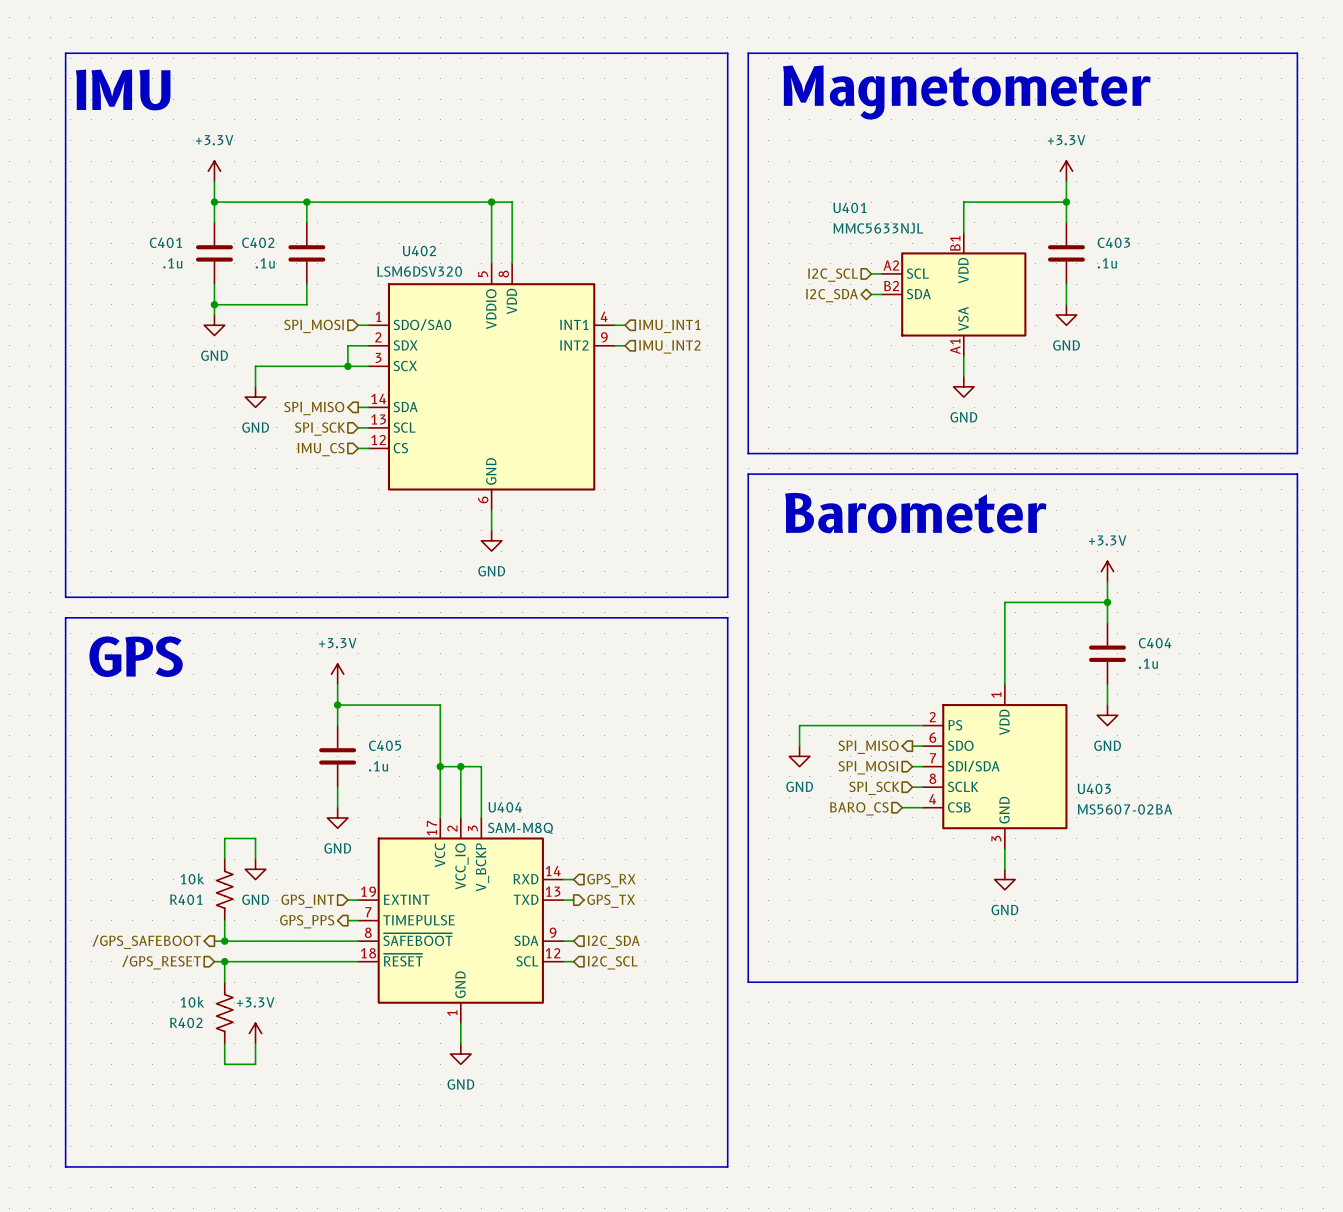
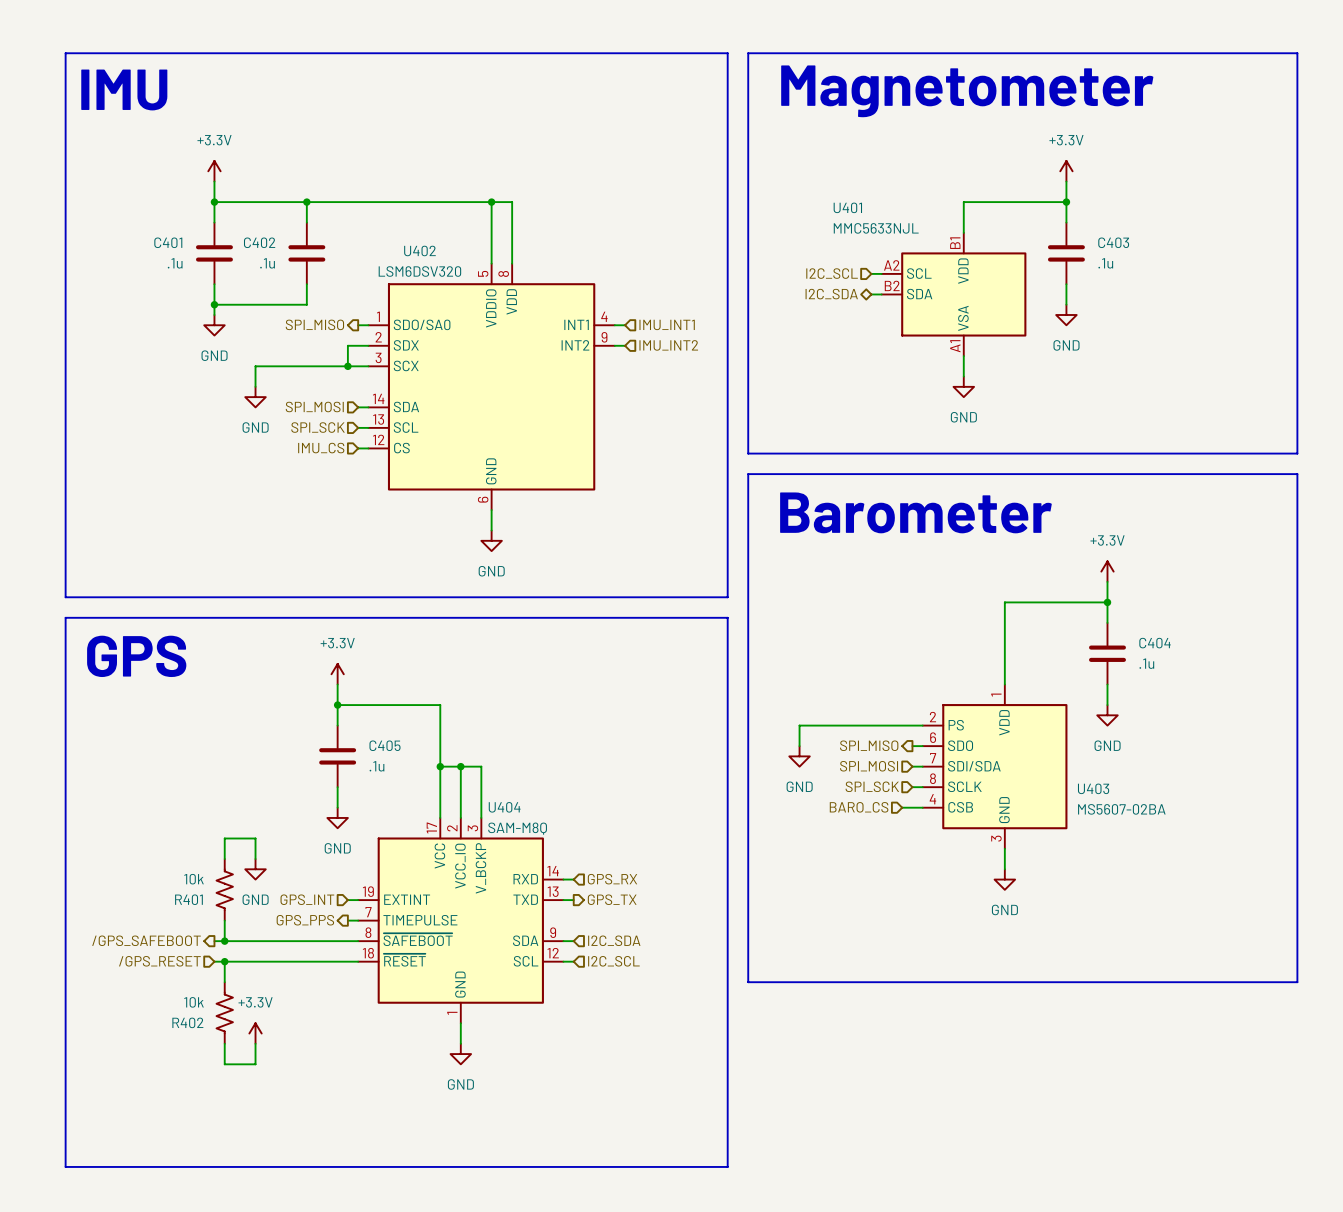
hierarchical label shape: input (314, 326) -> output (314, 324)
hierarchical label: SPI_MOSI (314, 326) -> SPI_MISO (314, 324)
hierarchical label shape: output (314, 408) -> input (314, 407)
hierarchical label: SPI_MISO (314, 408) -> SPI_MOSI (314, 407)

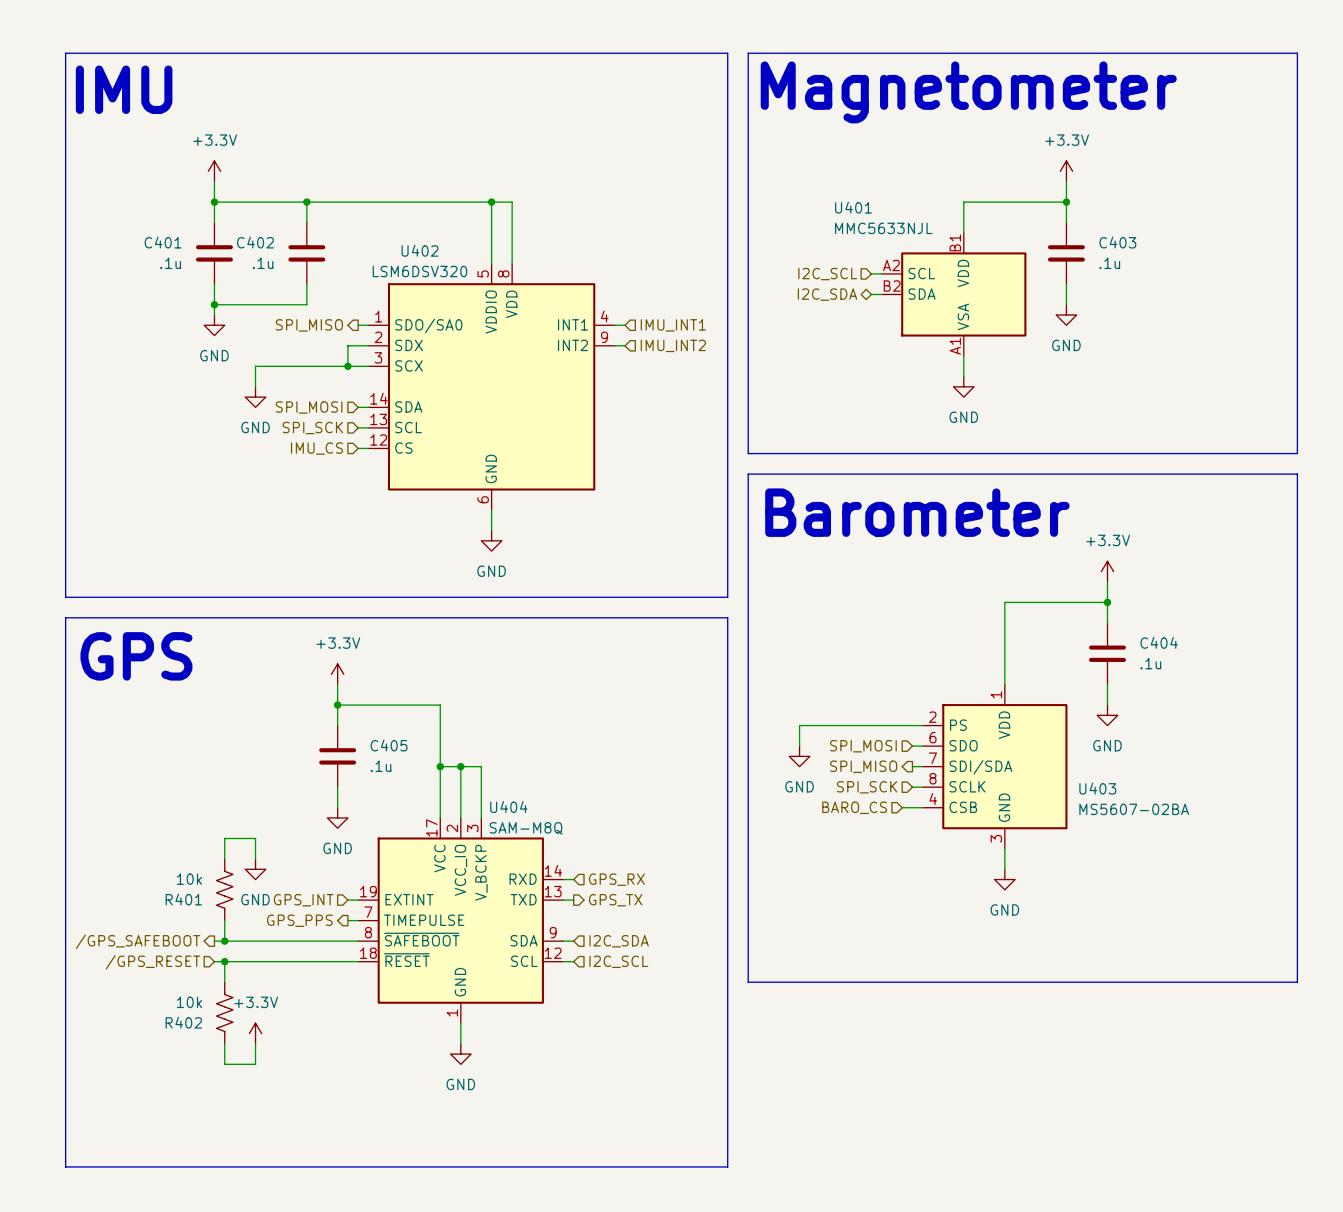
hierarchical label shape: output (869, 745) -> input (863, 746)
hierarchical label: SPI_MISO (869, 745) -> SPI_MOSI (863, 746)
hierarchical label shape: input (869, 766) -> output (863, 766)
hierarchical label: SPI_MOSI (869, 766) -> SPI_MISO (863, 766)

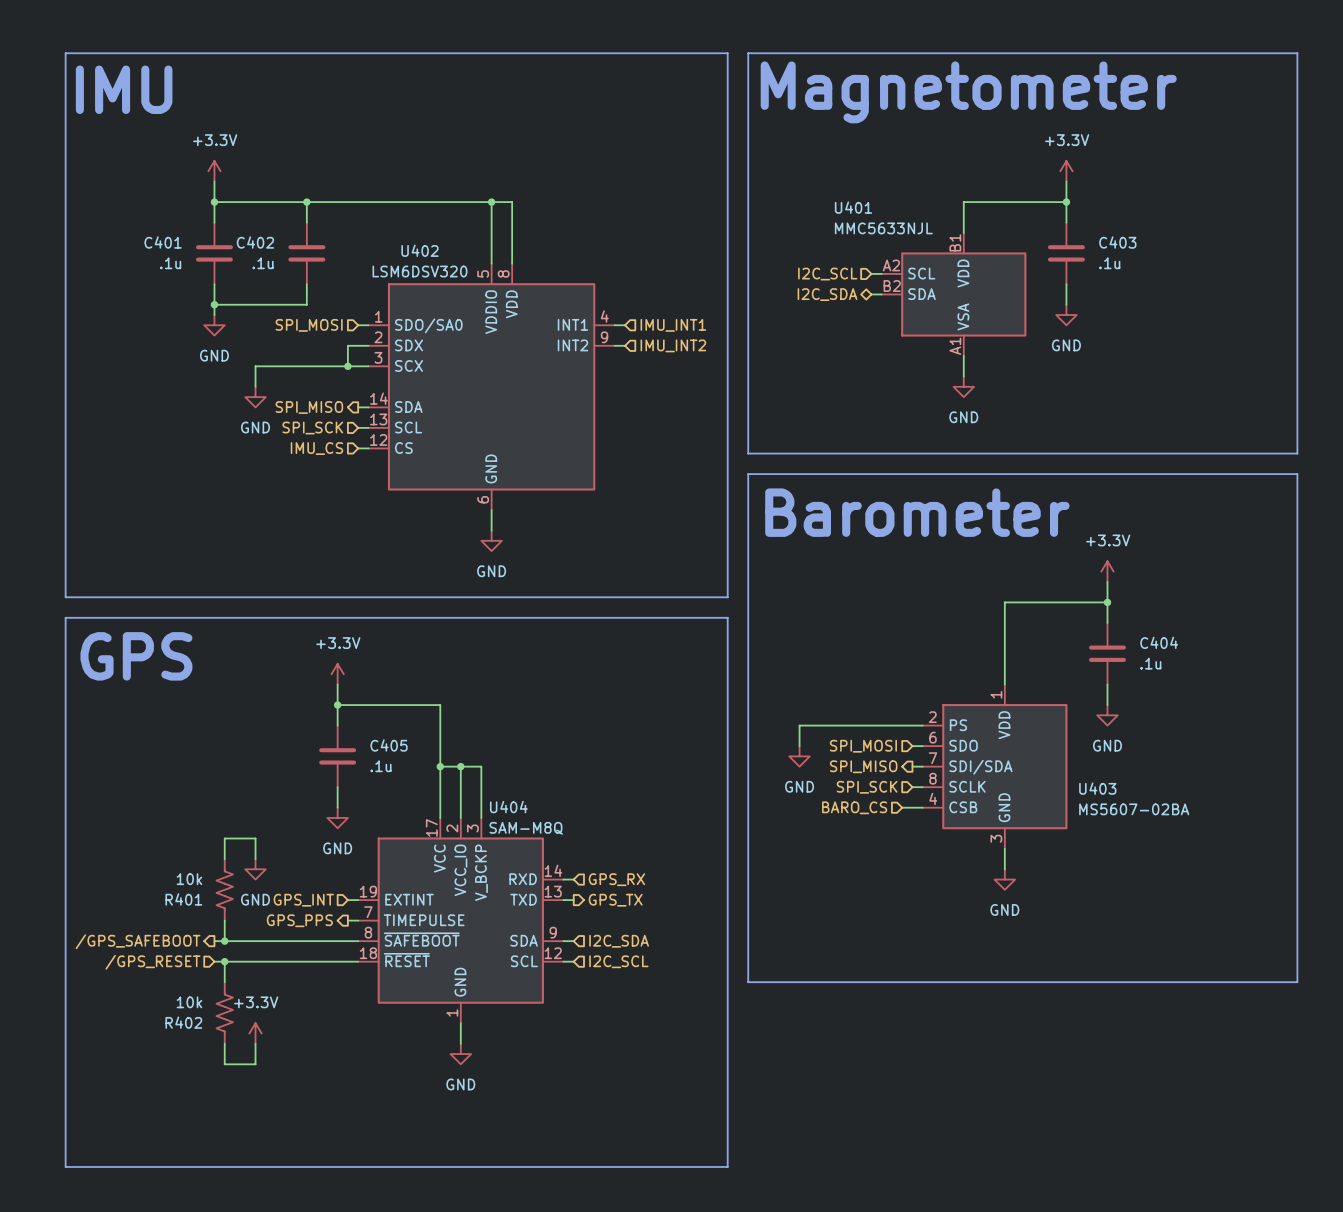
hierarchical label shape: output (309, 325) -> input (309, 325)
hierarchical label: SPI_MISO (309, 325) -> SPI_MOSI (309, 325)
hierarchical label shape: input (309, 407) -> output (309, 407)
hierarchical label: SPI_MOSI (309, 407) -> SPI_MISO (309, 407)

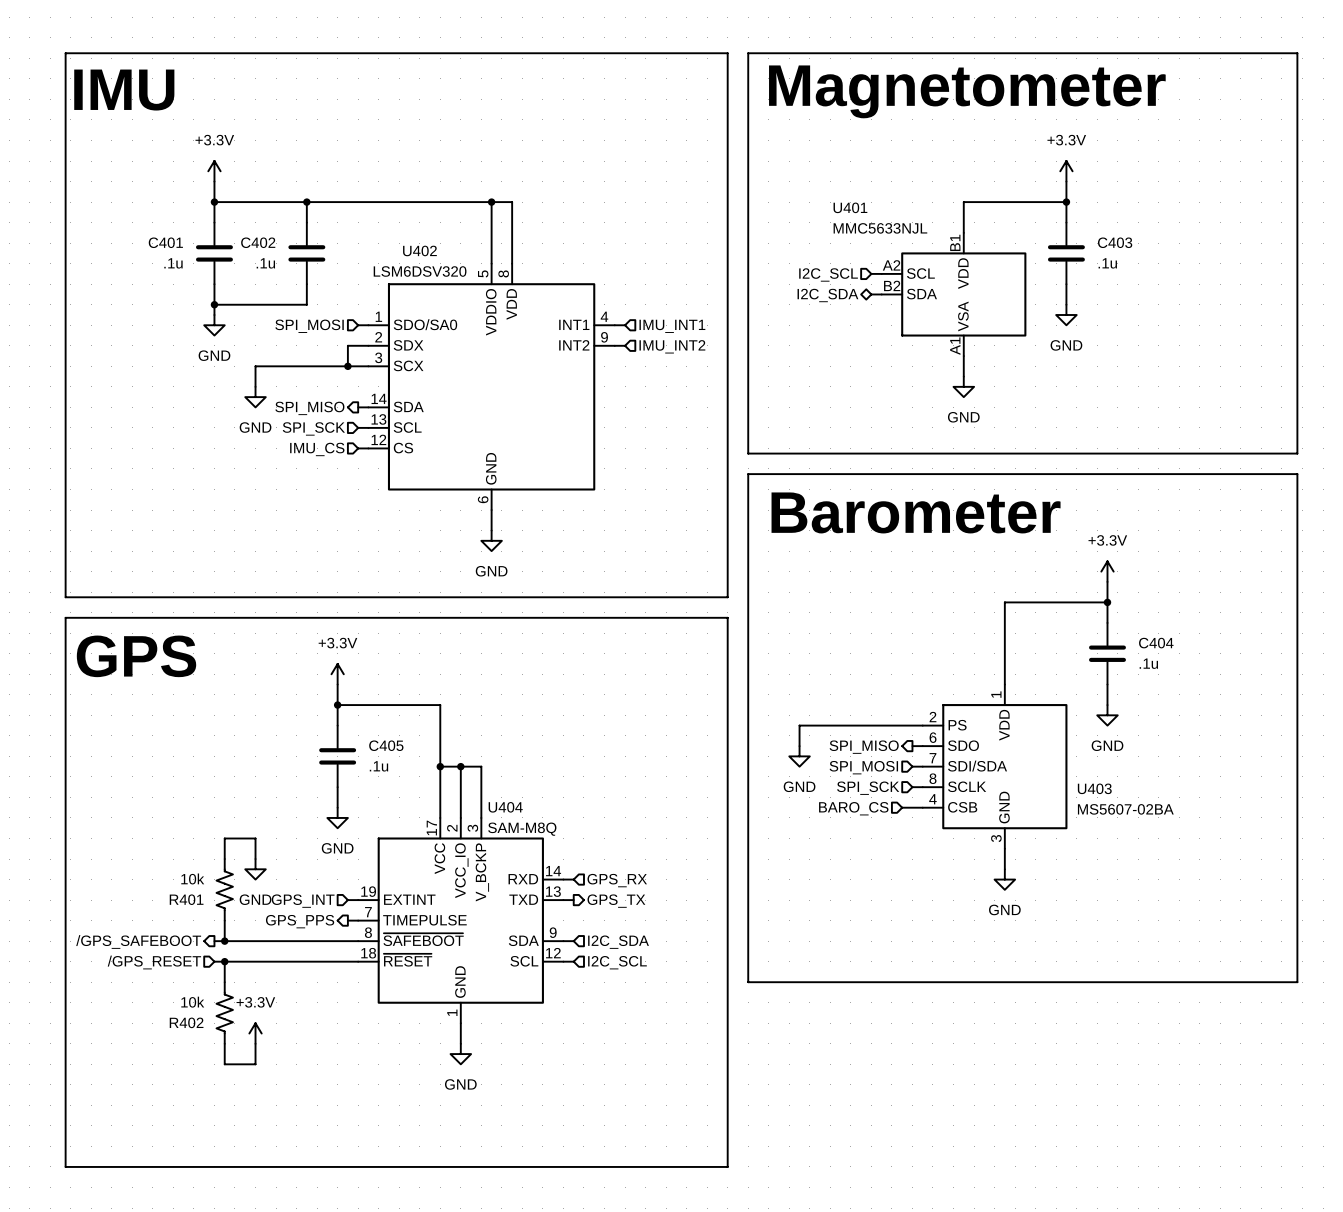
hierarchical label shape: input (863, 746) -> output (864, 747)
hierarchical label: SPI_MOSI (863, 746) -> SPI_MISO (864, 747)
hierarchical label shape: output (863, 766) -> input (863, 767)
hierarchical label: SPI_MISO (863, 766) -> SPI_MOSI (863, 767)

